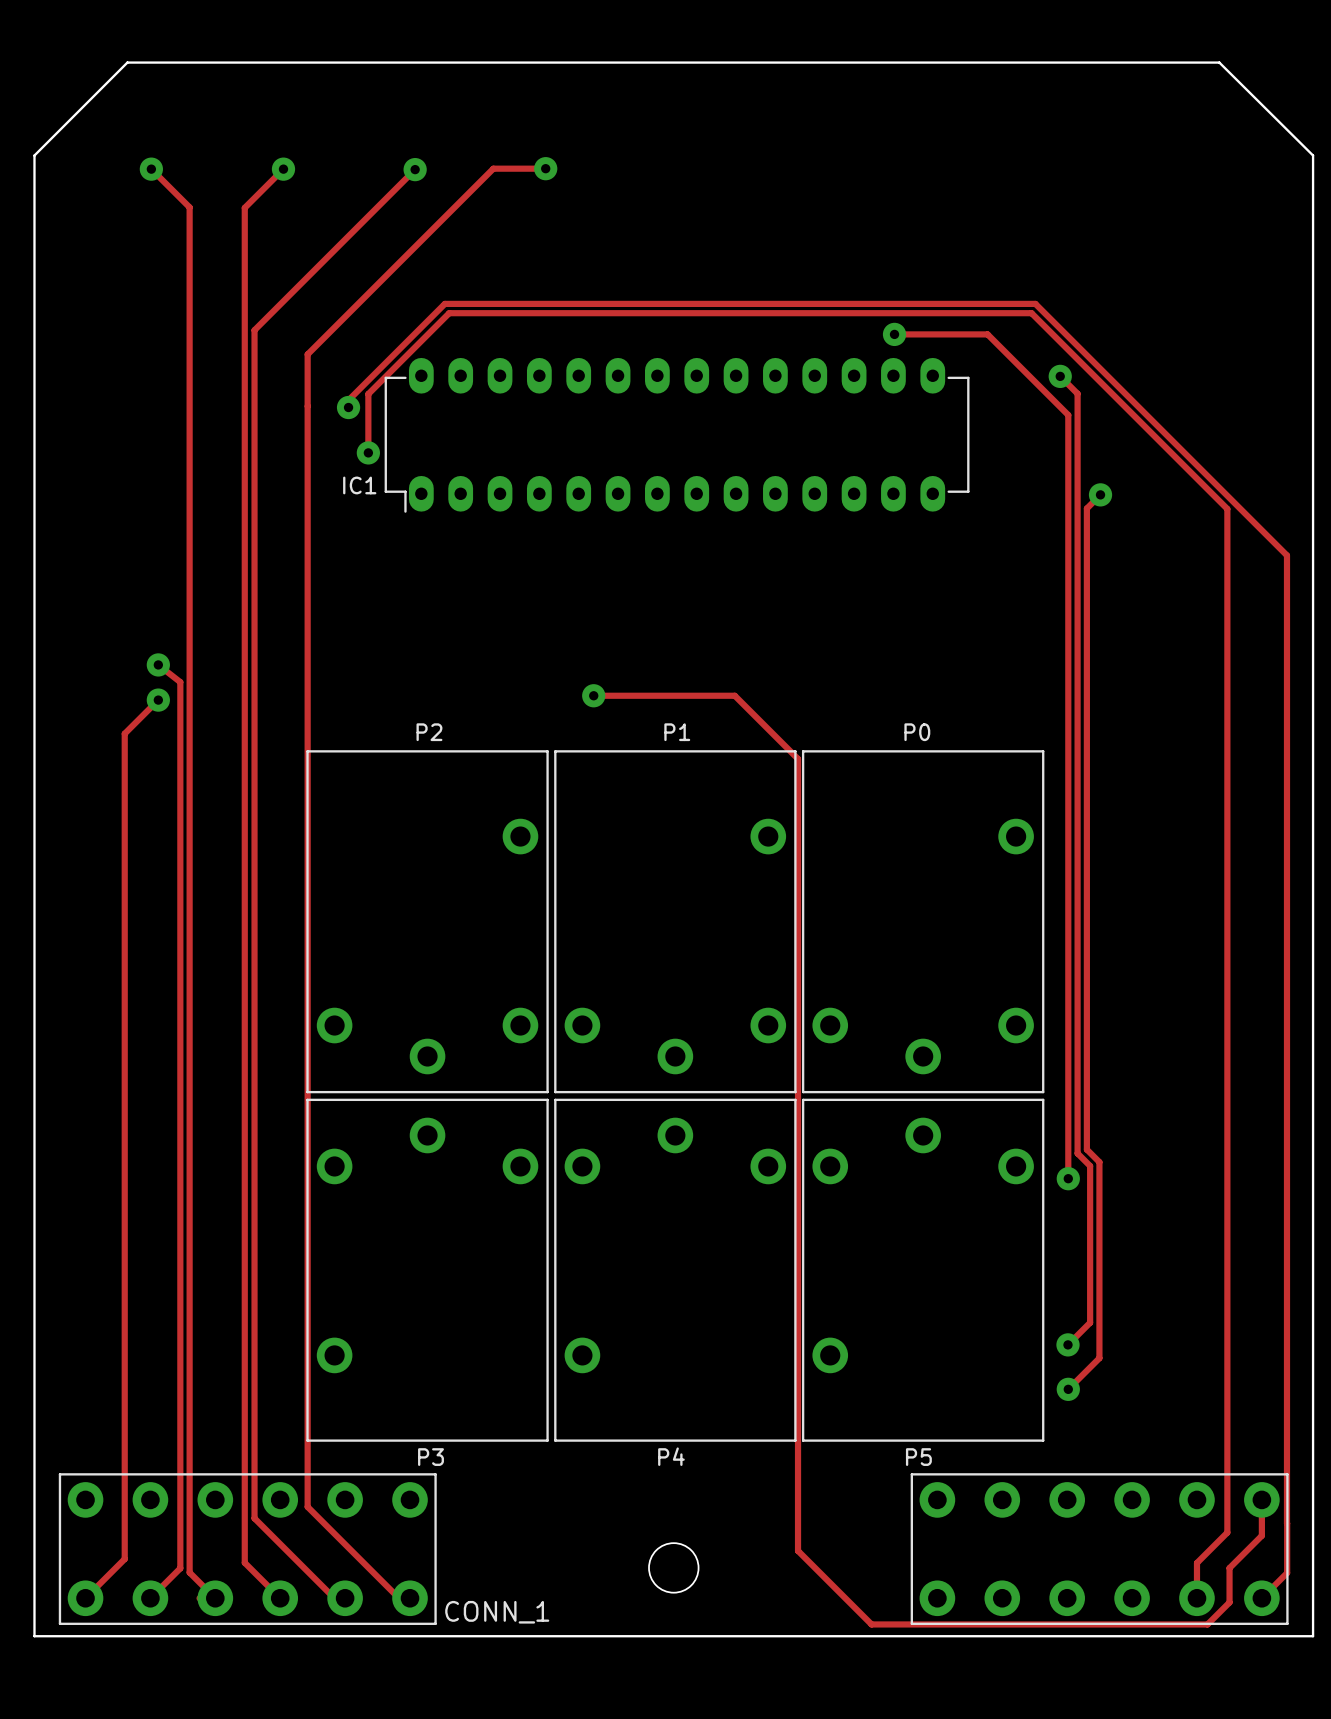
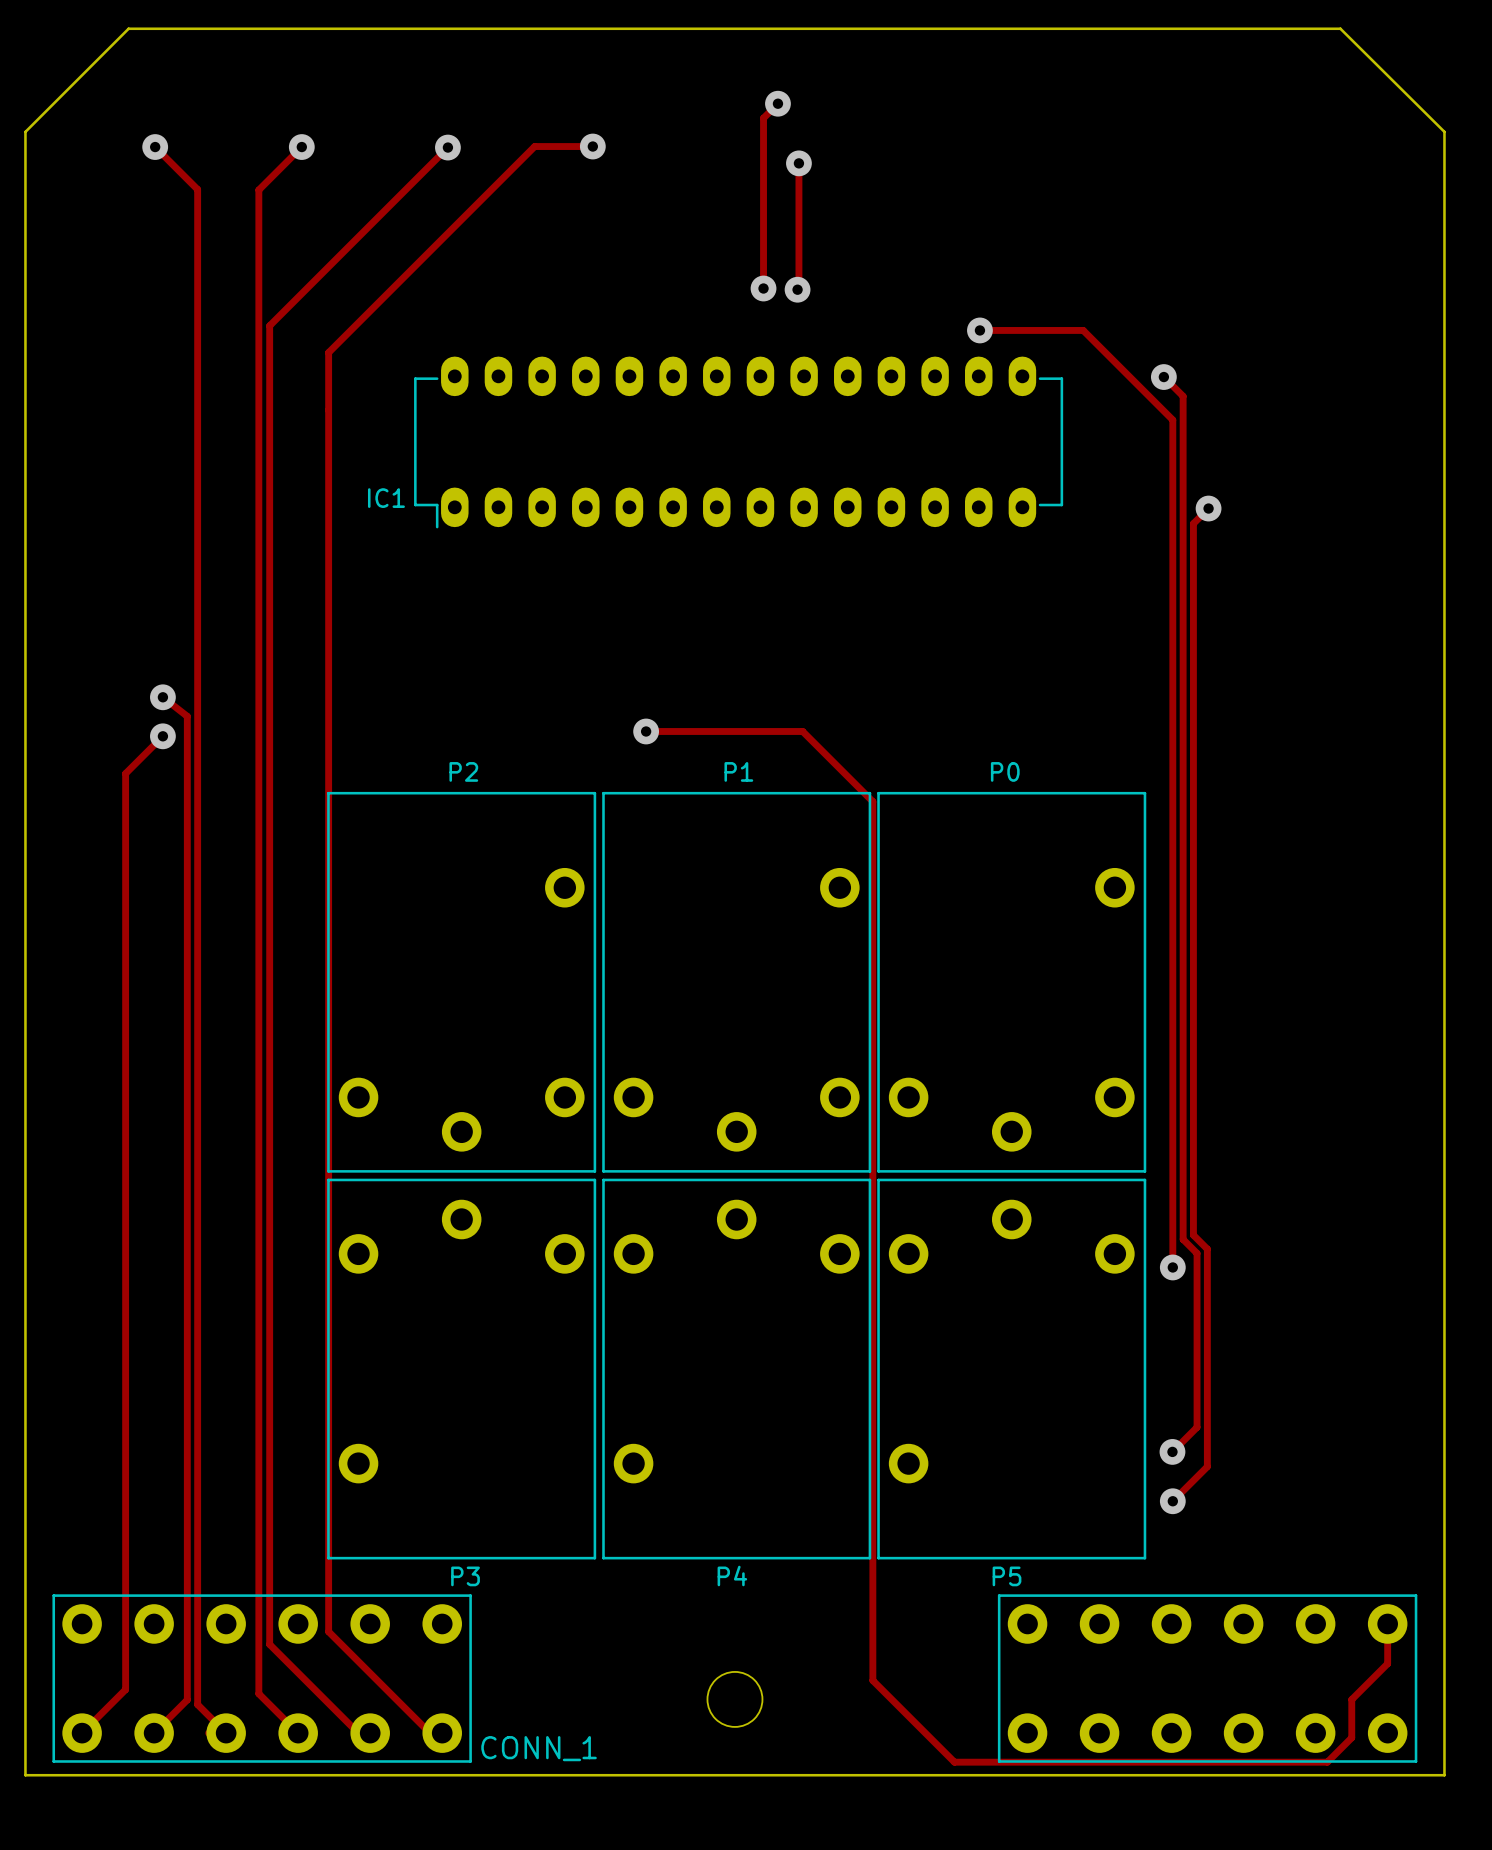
track: none -> (777, 103) (763, 118) (763, 288)
via: none -> (777, 103)
track: none -> (798, 163) (797, 289)
via: none -> (798, 163)
via: none -> (763, 288)
via: none -> (797, 289)
track: (348, 407) (348, 400) (444, 303) (1035, 303) (1287, 555) (1287, 1523) -> none
via: (348, 407) -> none
track: (368, 452) (368, 394) (449, 313) (1031, 313) (1227, 508) (1227, 1532) (1196, 1562) (1196, 1598) -> none
via: (368, 452) -> none
track: (1287, 1523) (1287, 1573) (1261, 1598) -> none

